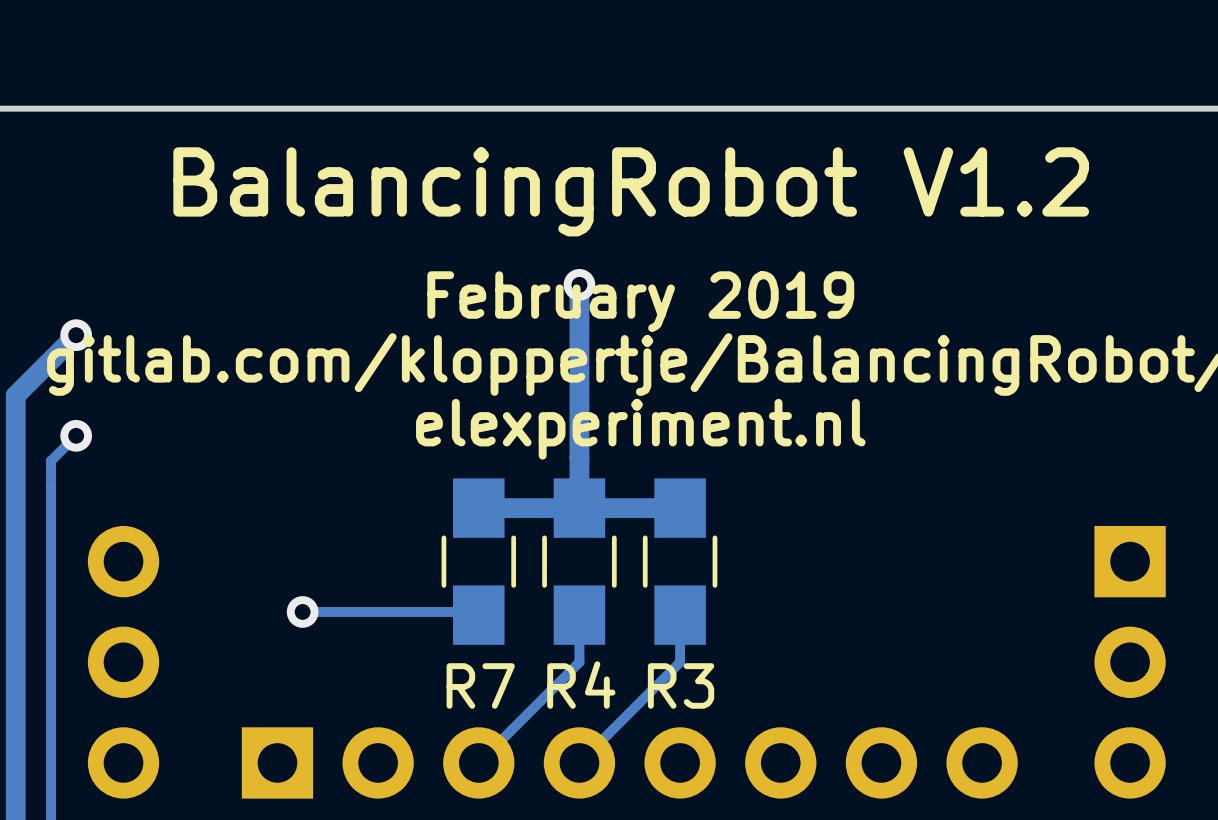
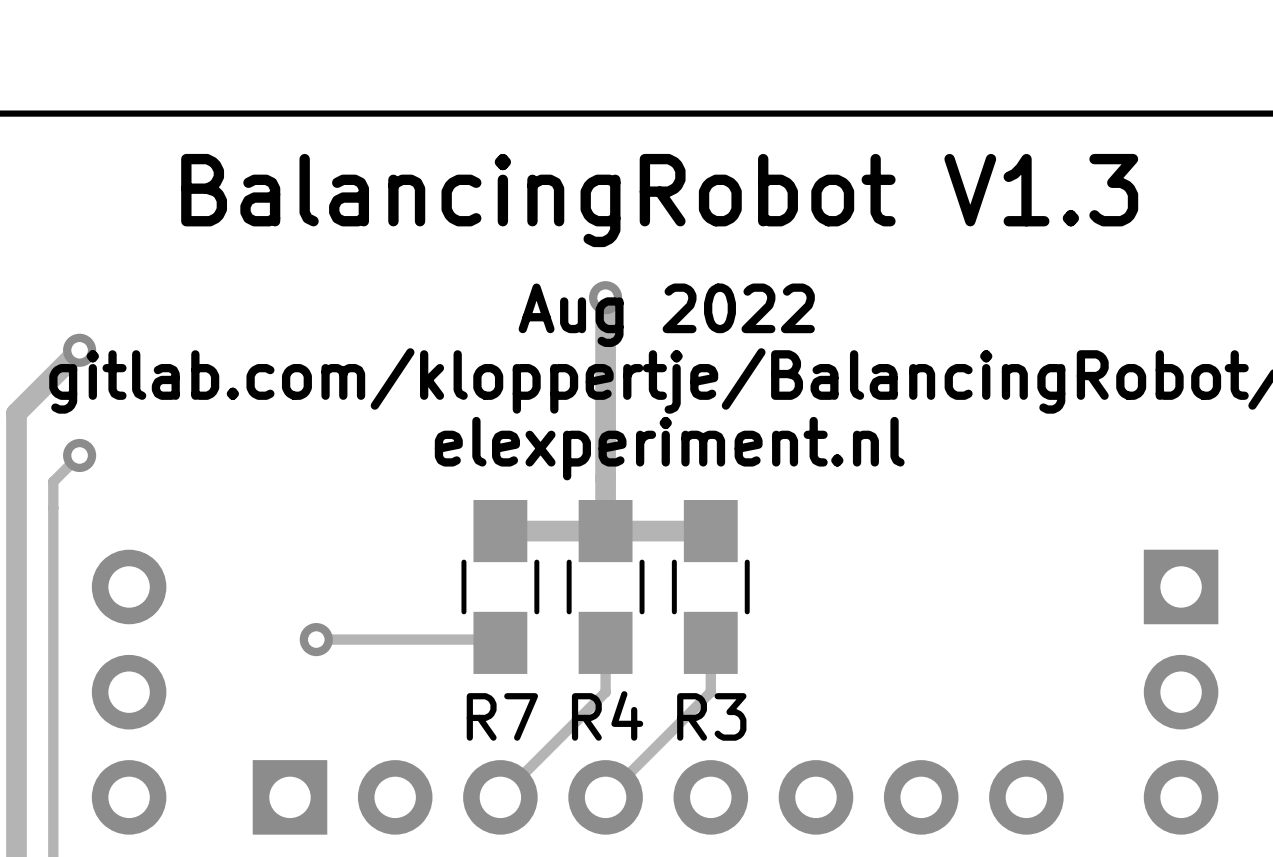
text: BalancingRobot V1.2 (631, 191) -> BalancingRobot V1.3 (659, 200)
text: February 2019 (640, 301) -> Aug 2022 (666, 315)

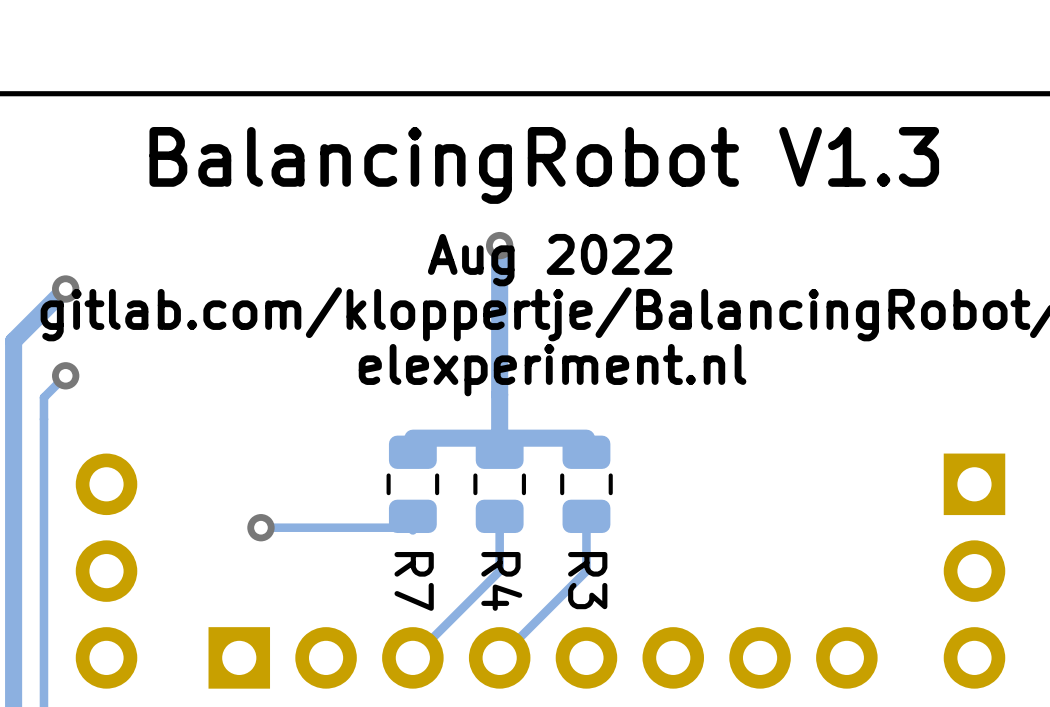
R7 footprint: [461, 500, 540, 674] -> [386, 435, 440, 534]
R4 footprint: [566, 500, 645, 674] -> [473, 435, 526, 534]
R3 footprint: [671, 500, 750, 674] -> [560, 435, 613, 534]
R4 name rotation: 0° (607, 715) -> 90° clockwise (501, 581)
R7 name rotation: 0° (502, 716) -> 90° clockwise (414, 581)
R3 name rotation: 0° (711, 716) -> 90° clockwise (587, 580)

